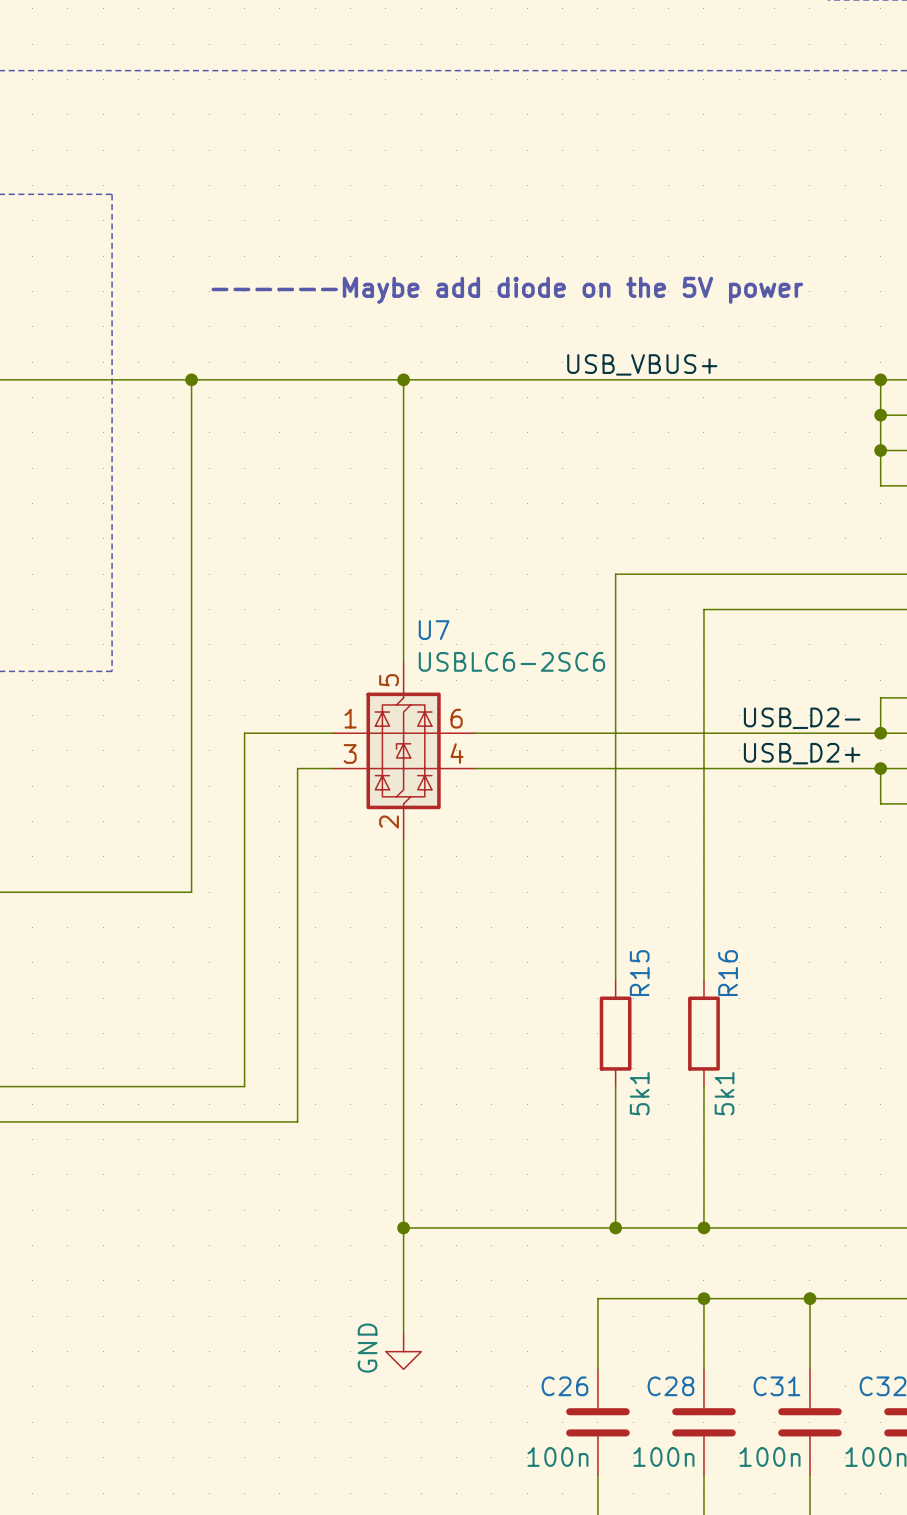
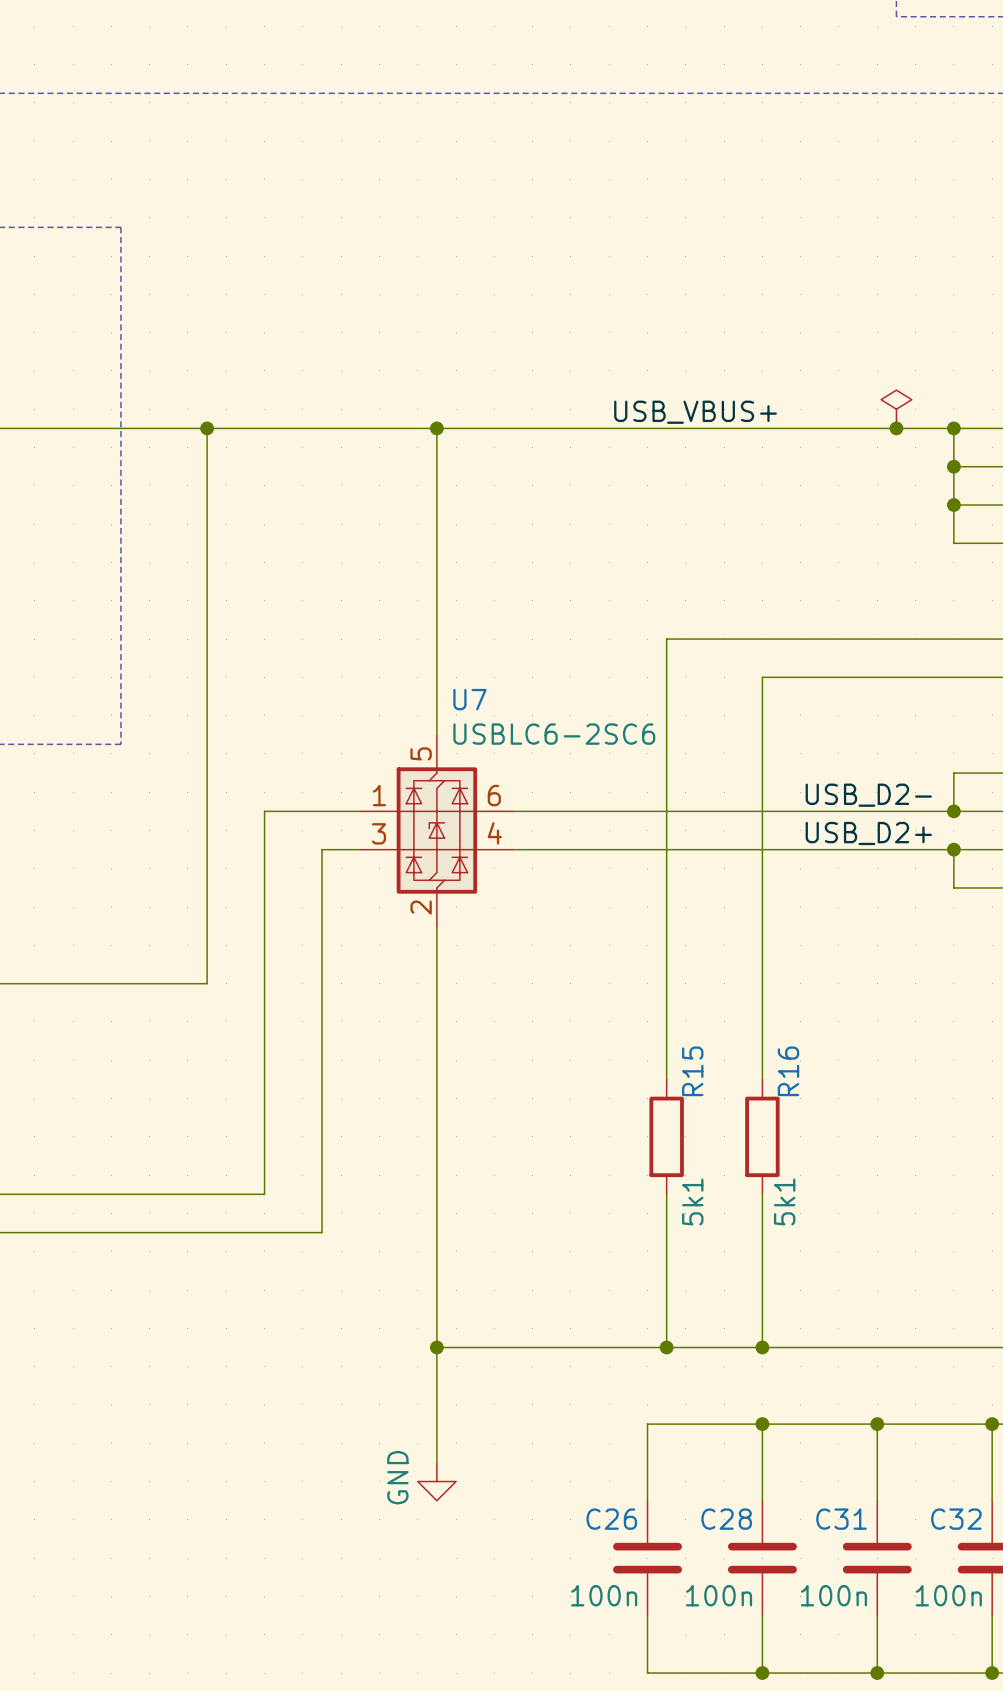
text: ------Maybe add diode on the 5V power (507, 290) -> none
power symbol: none -> (896, 409)
junction: none -> (896, 428)

